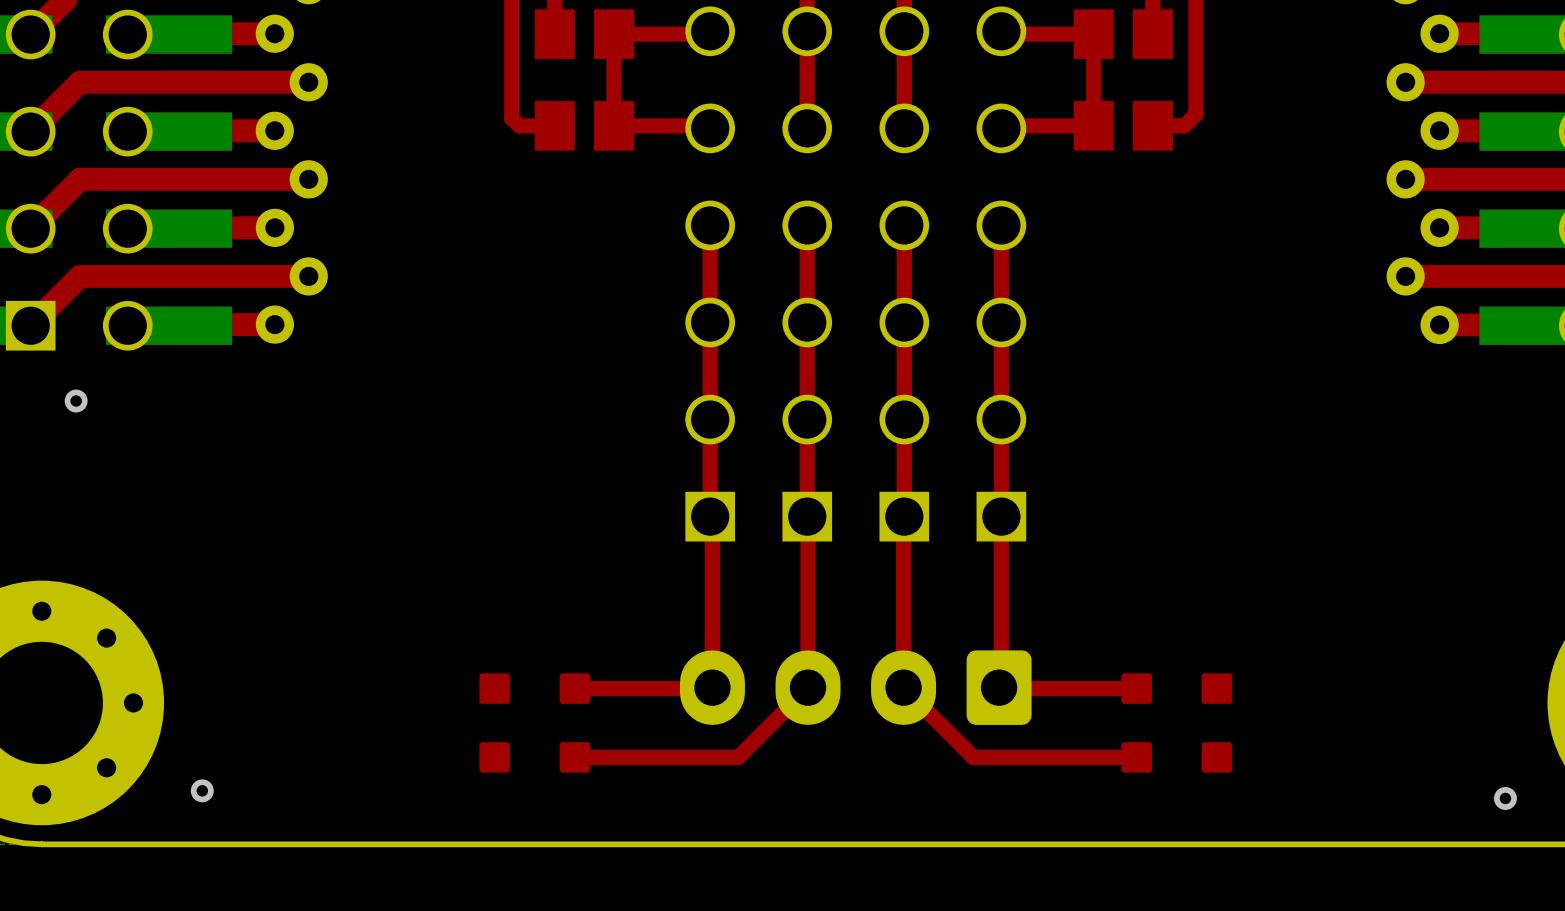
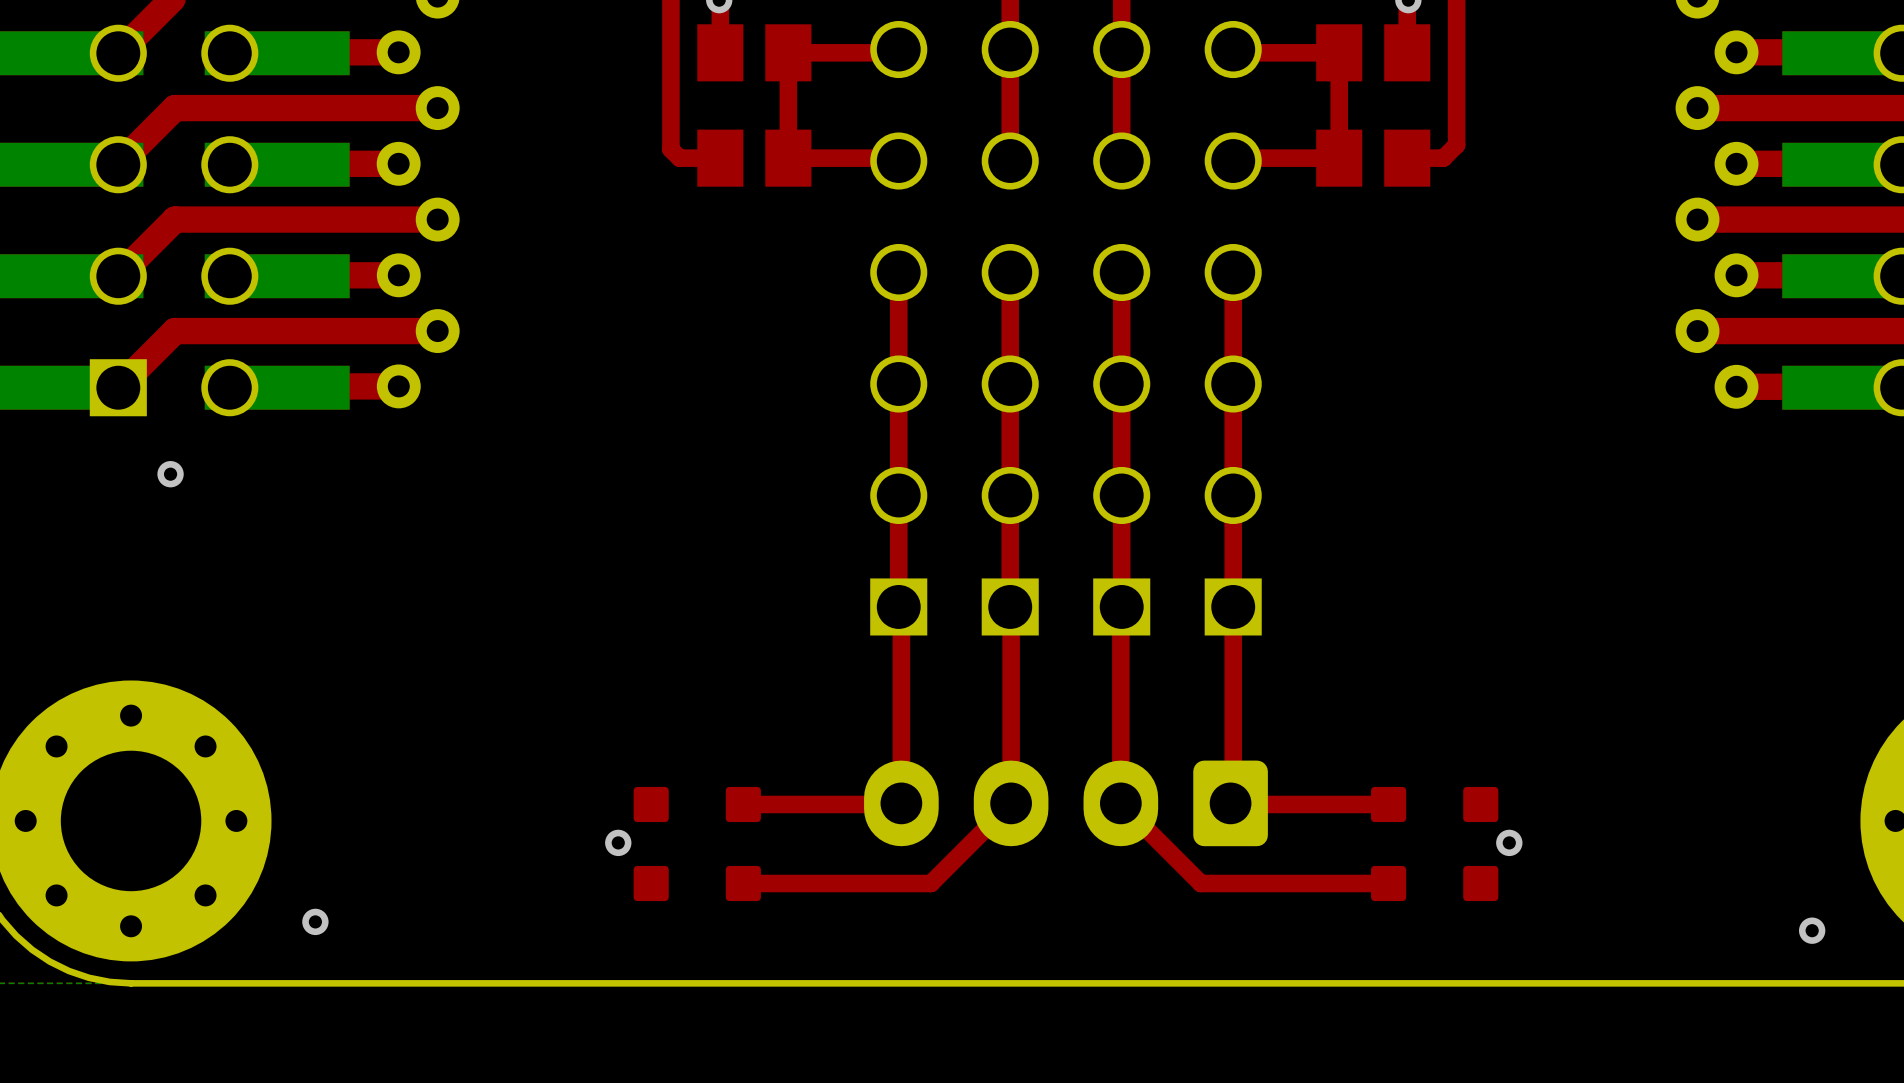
via: none -> (618, 842)
via: none -> (1509, 842)

